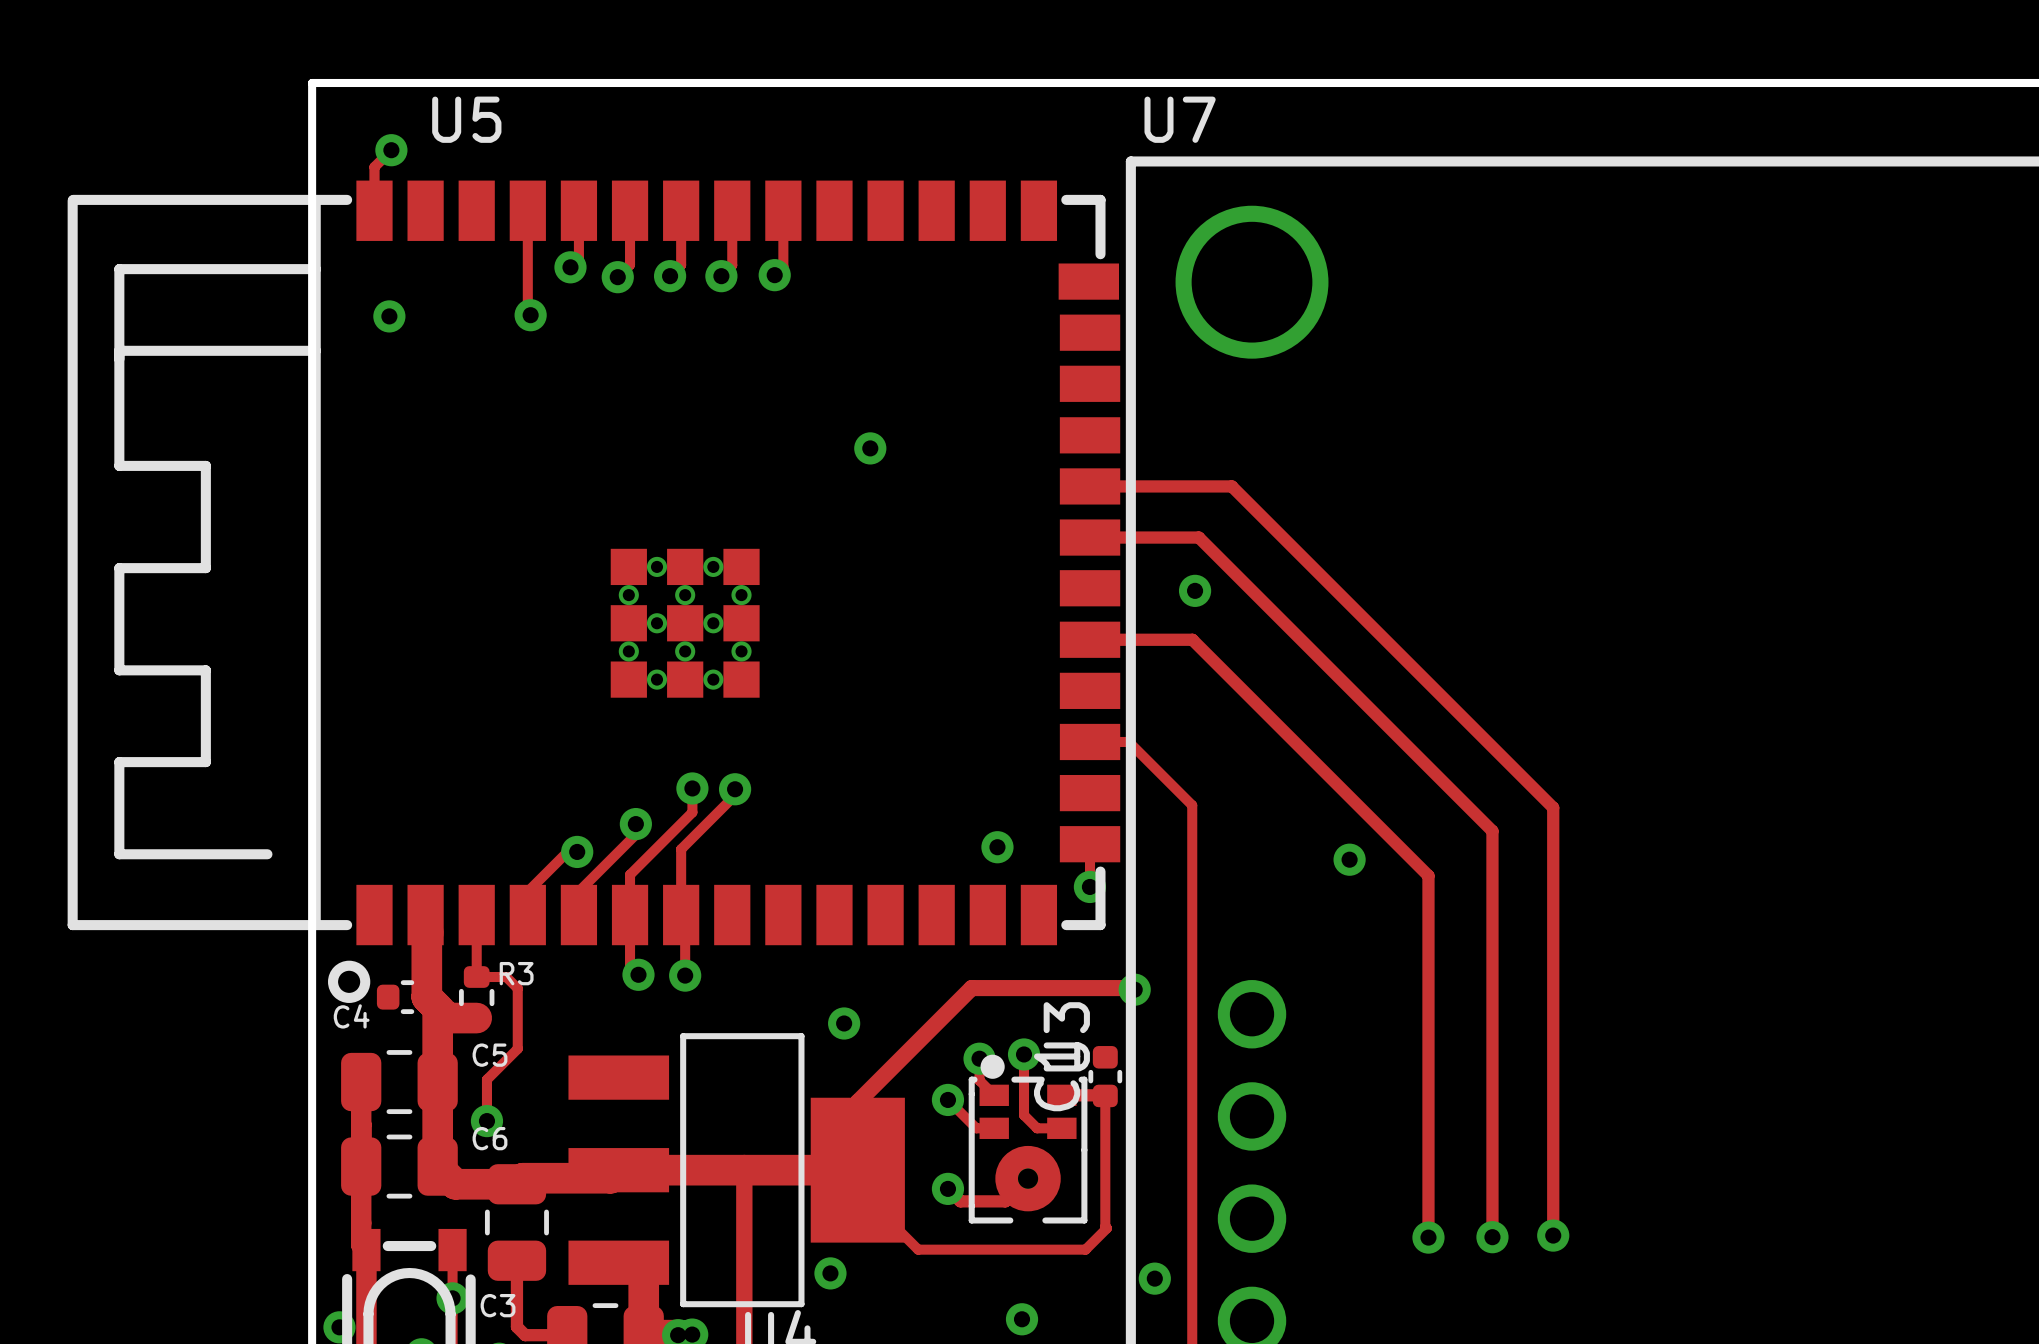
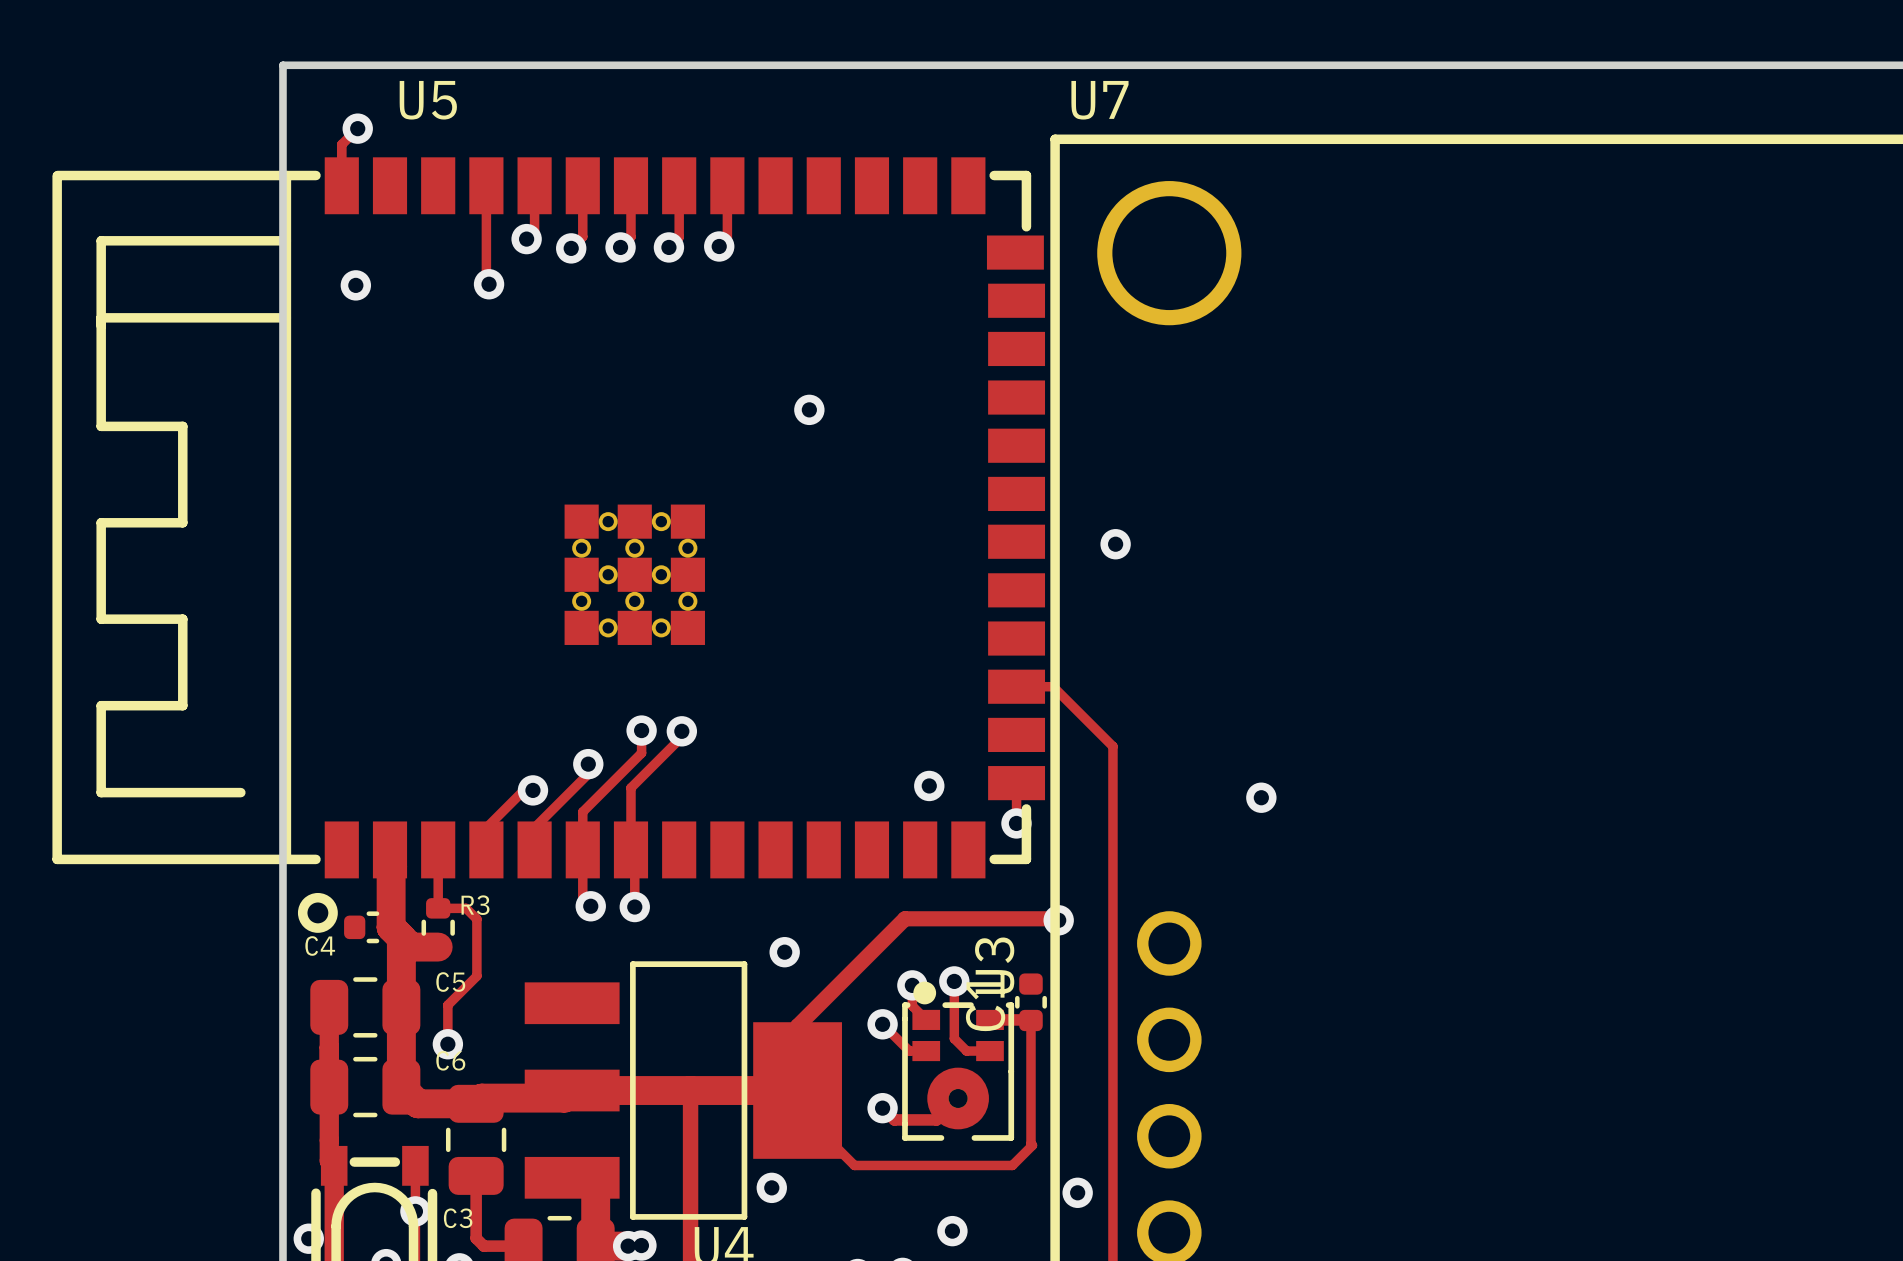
track: (1090, 486) (1231, 486) (1553, 807) (1553, 1235) -> none
track: (1090, 537) (1198, 537) (1492, 831) (1492, 1237) -> none
track: (1090, 639) (1192, 639) (1428, 875) (1428, 1237) -> none
via: (1553, 1235) -> none
via: (1428, 1237) -> none
via: (1492, 1237) -> none

